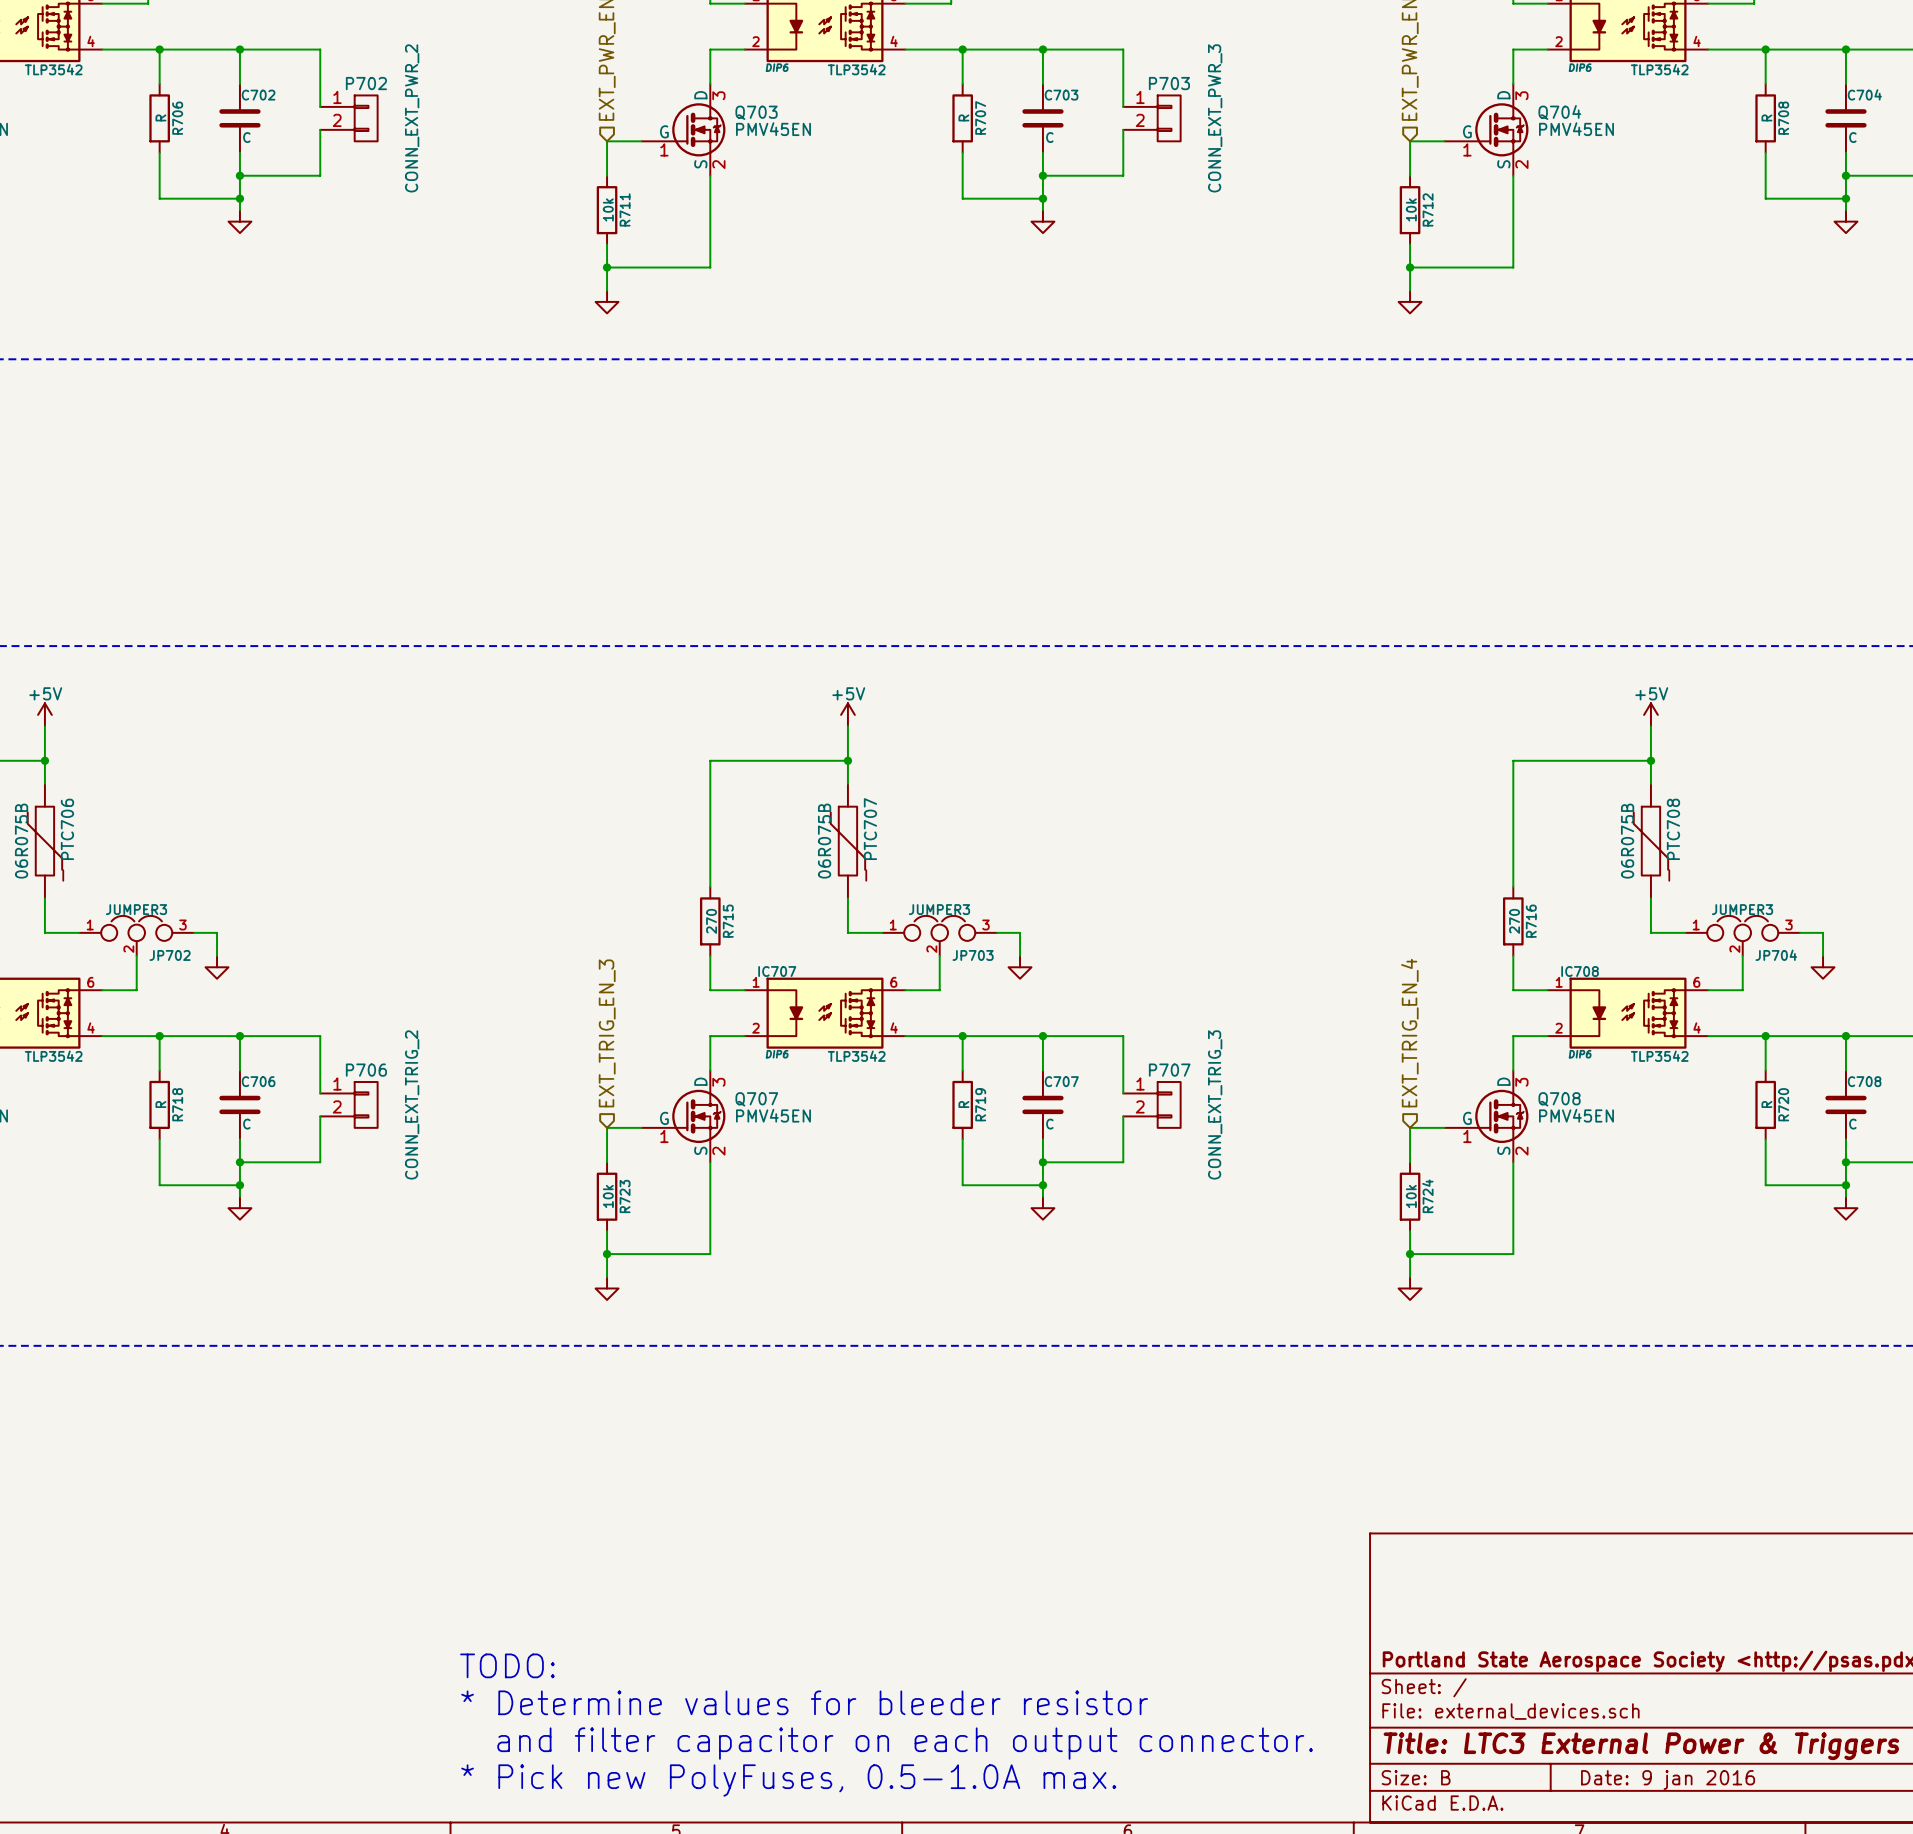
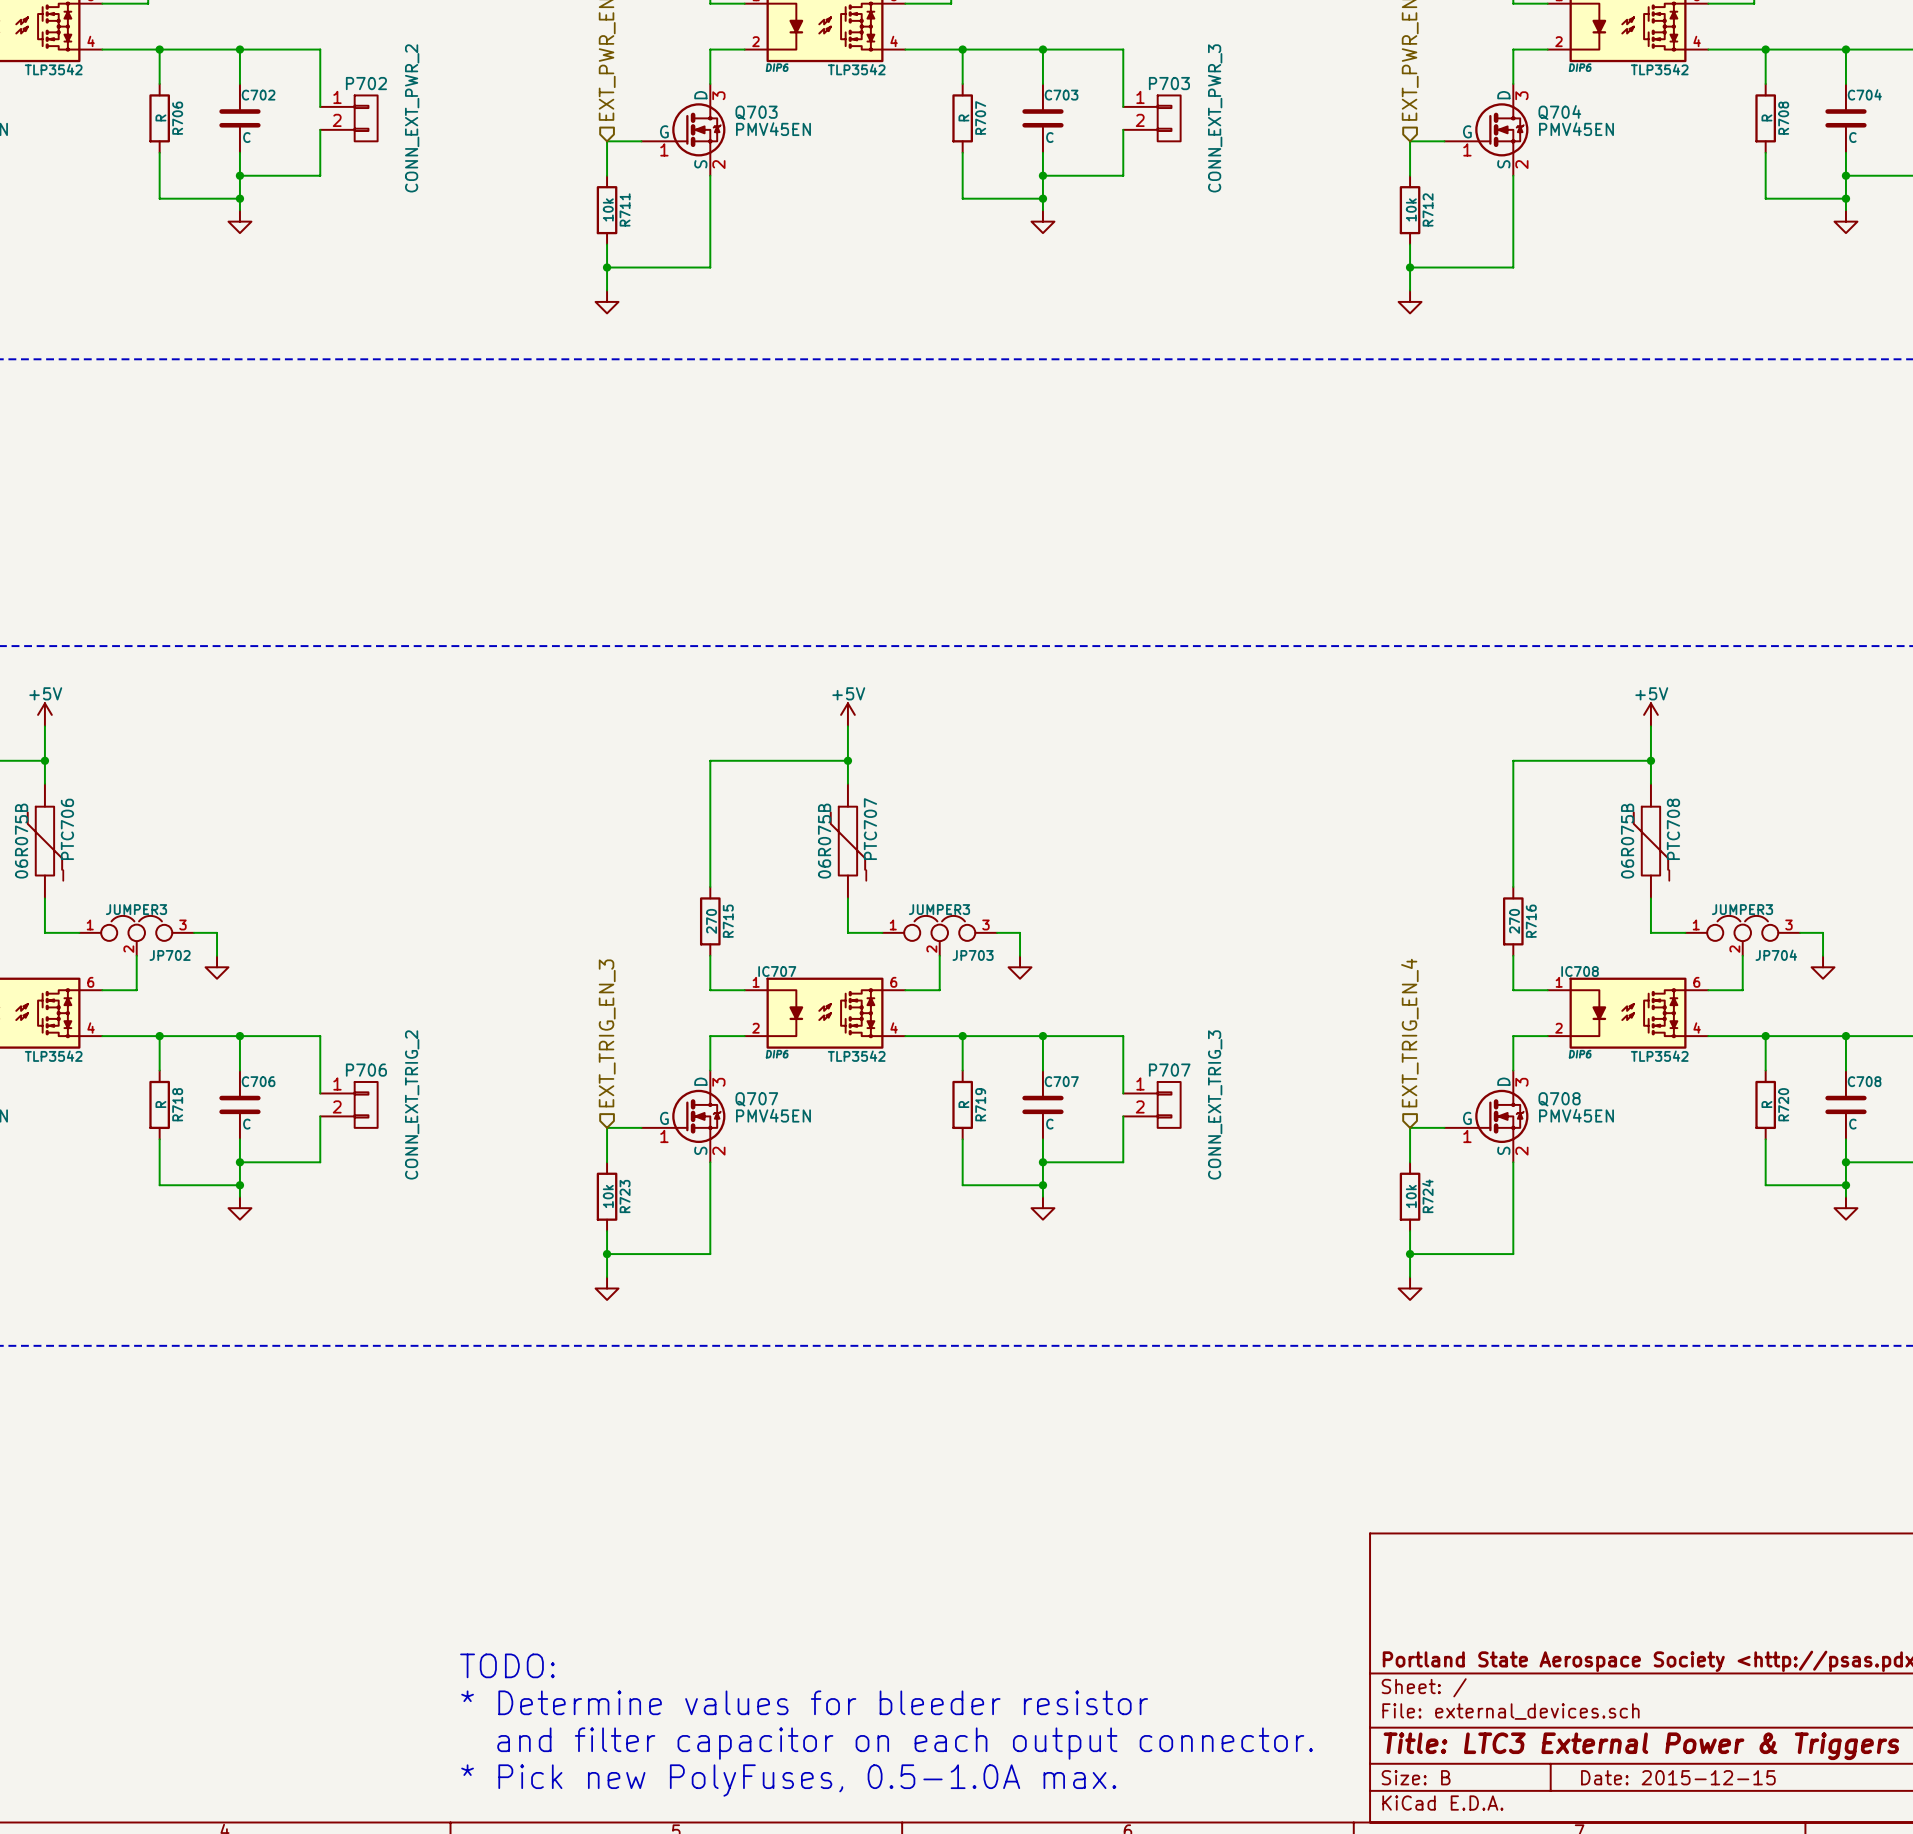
title block: Date: 9 jan 2016 (1668, 1779) -> Date: 2015-12-15 (1678, 1777)

